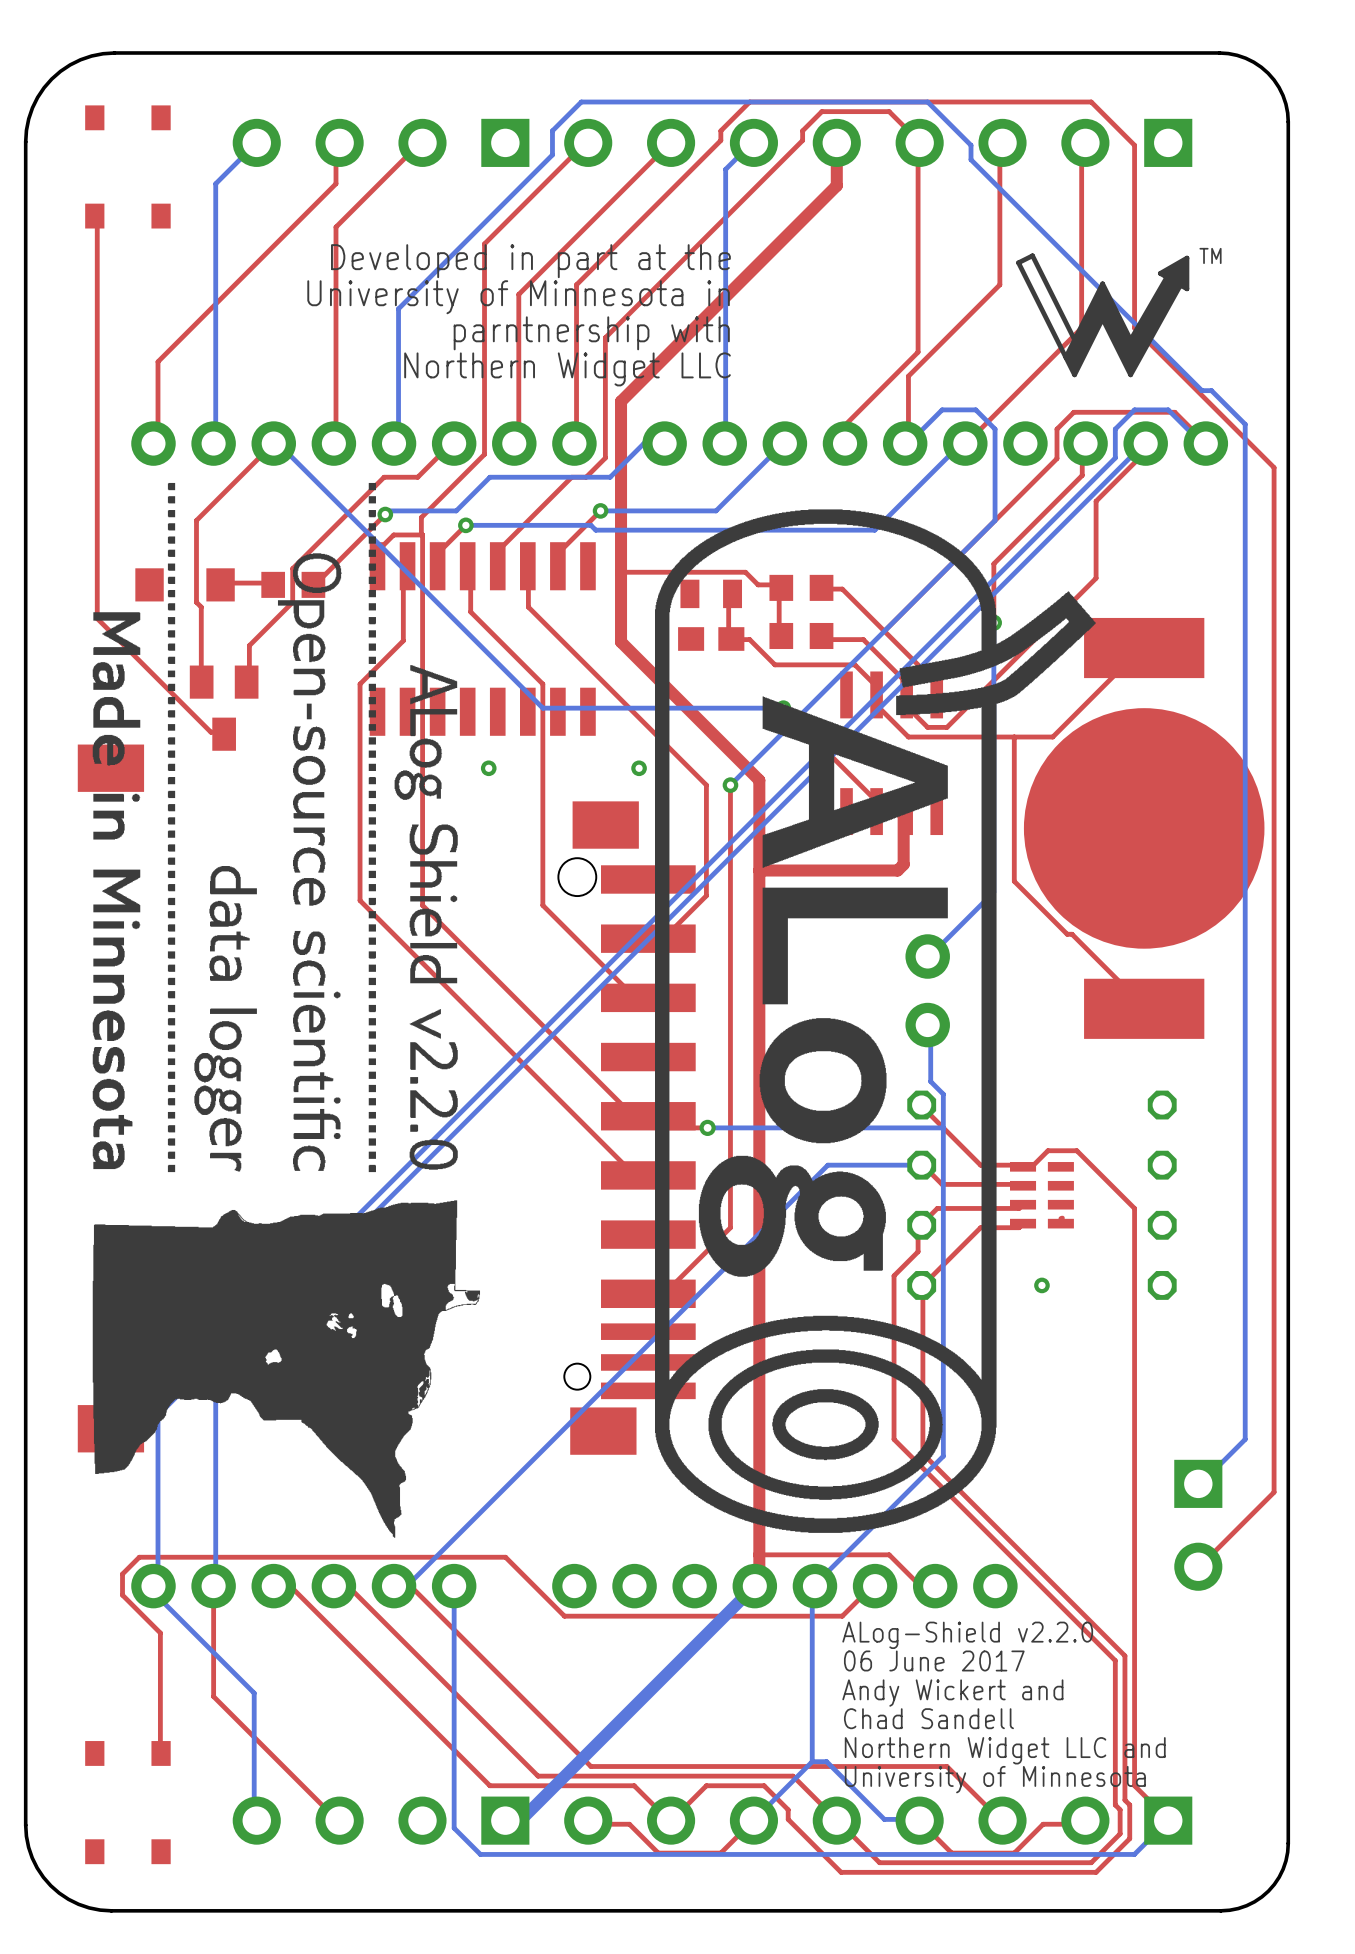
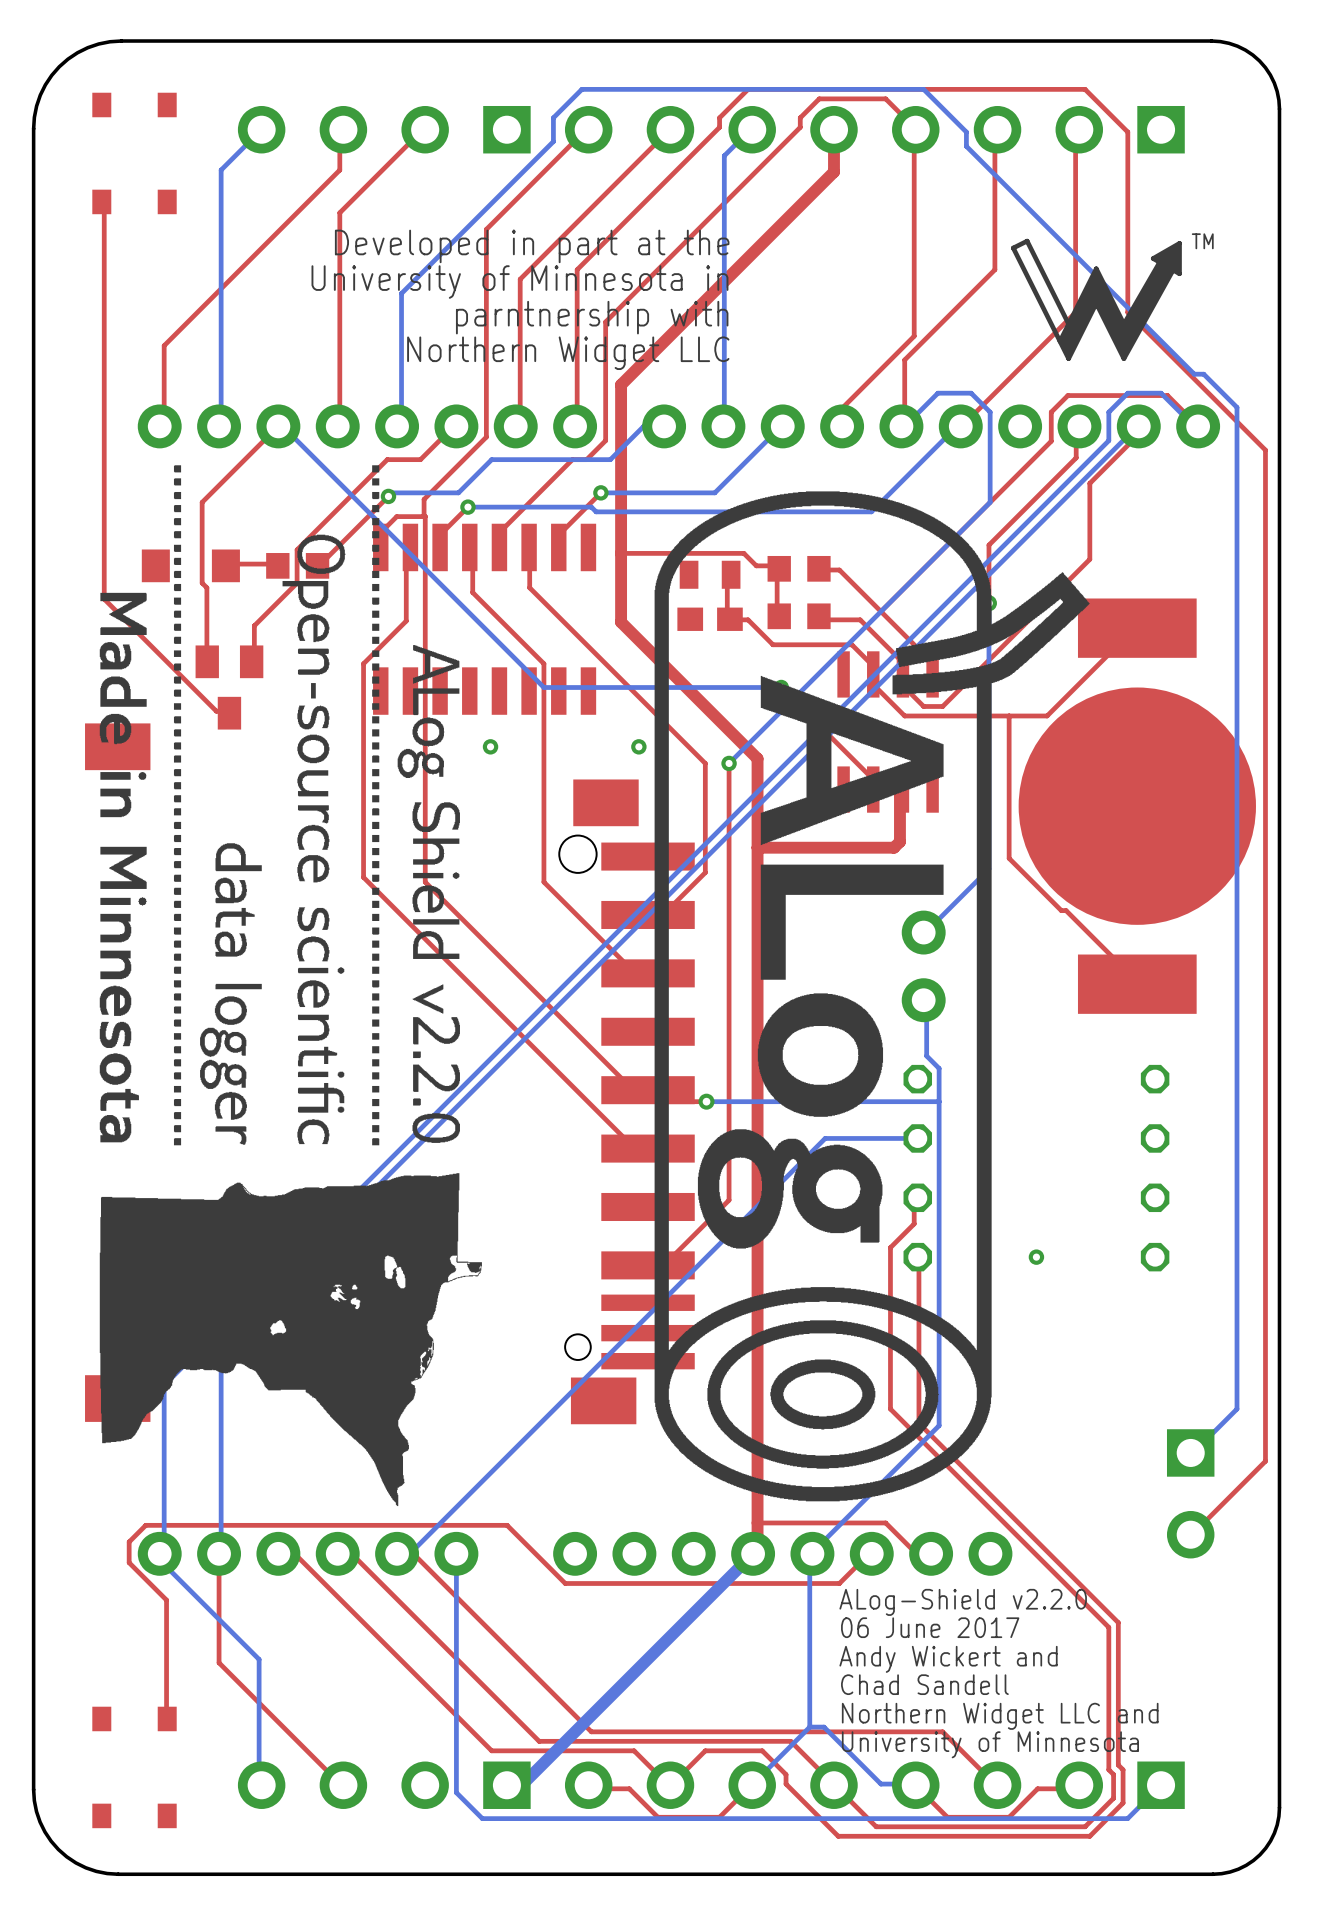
top track: (921, 1105) (980, 1165) (1019, 1165) (1023, 1166) (1033, 1165) (1047, 1150) (1076, 1150) (1134, 1208) (1134, 1785) (1168, 1820) -> none
top track: (921, 1165) (942, 1184) (1023, 1185) -> none
part: (1041, 1195) -> none
top track: (1023, 1204) (1019, 1208) (937, 1208) (921, 1225) -> none
top track: (1062, 1218) (1060, 1218) -> none
top track: (1023, 1223) (1019, 1227) (980, 1227) (922, 1285) -> none

